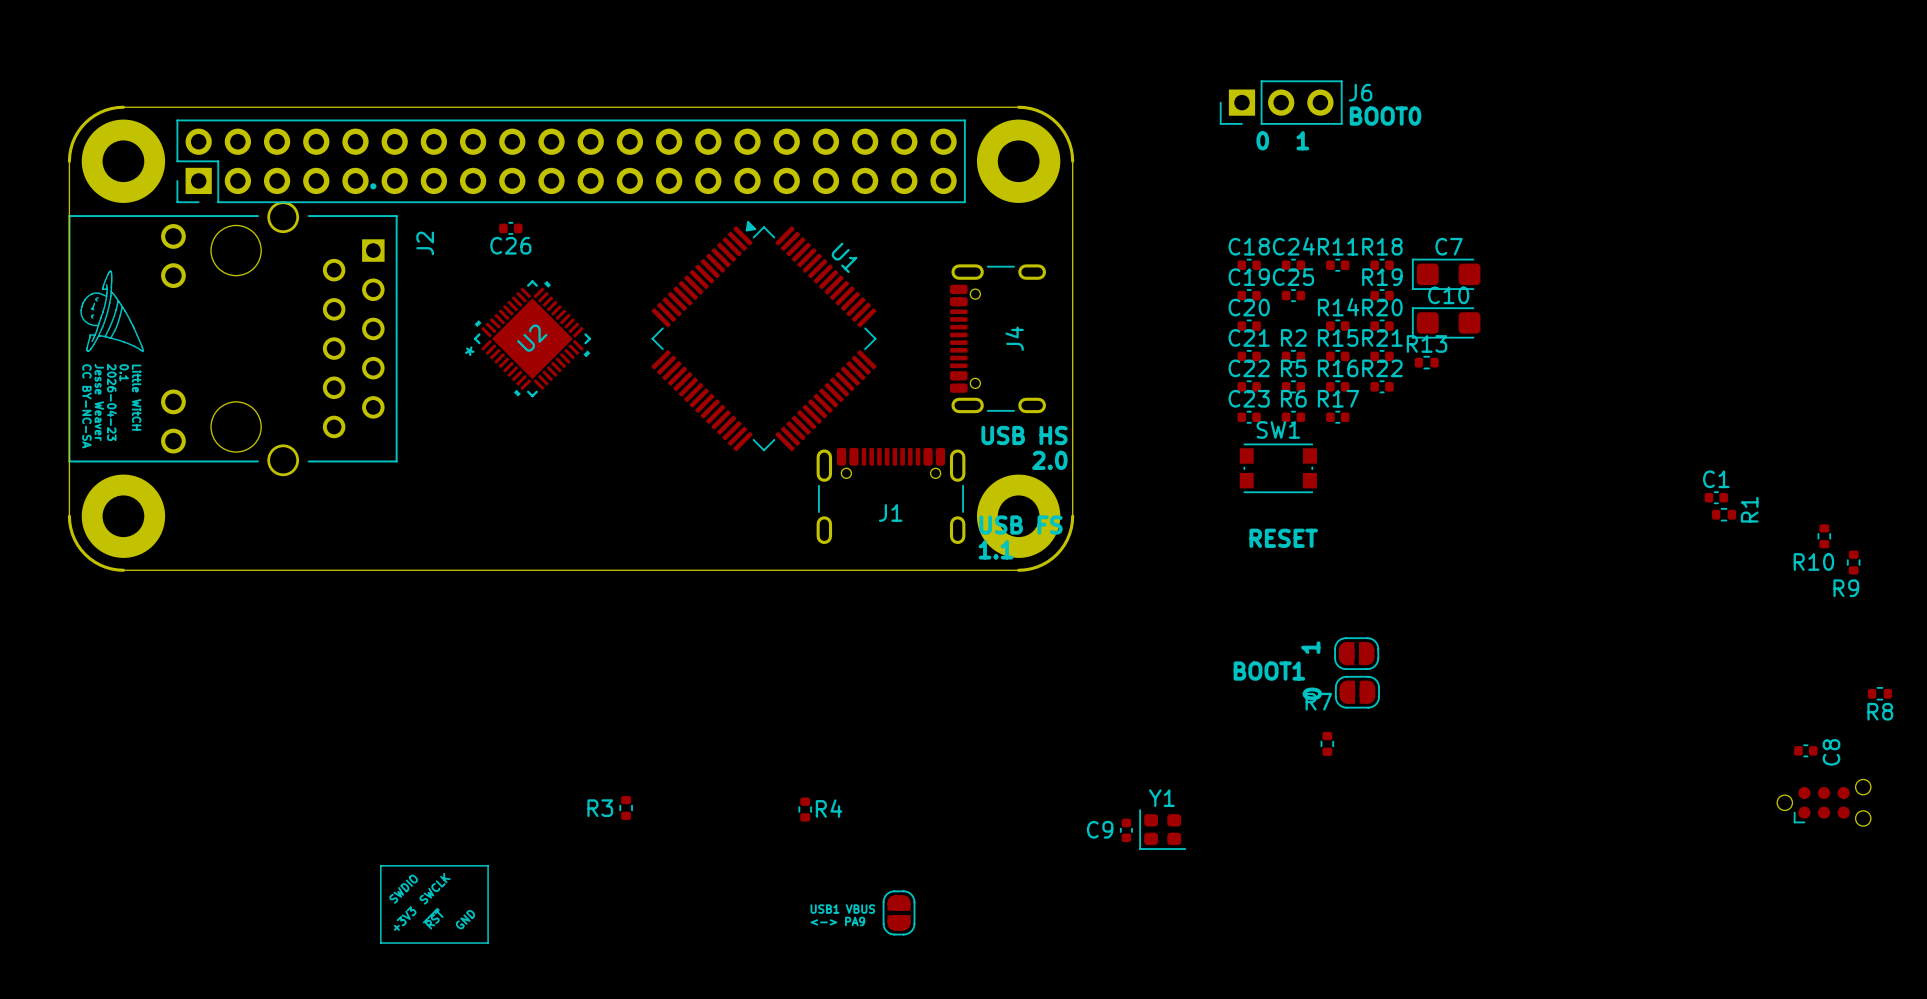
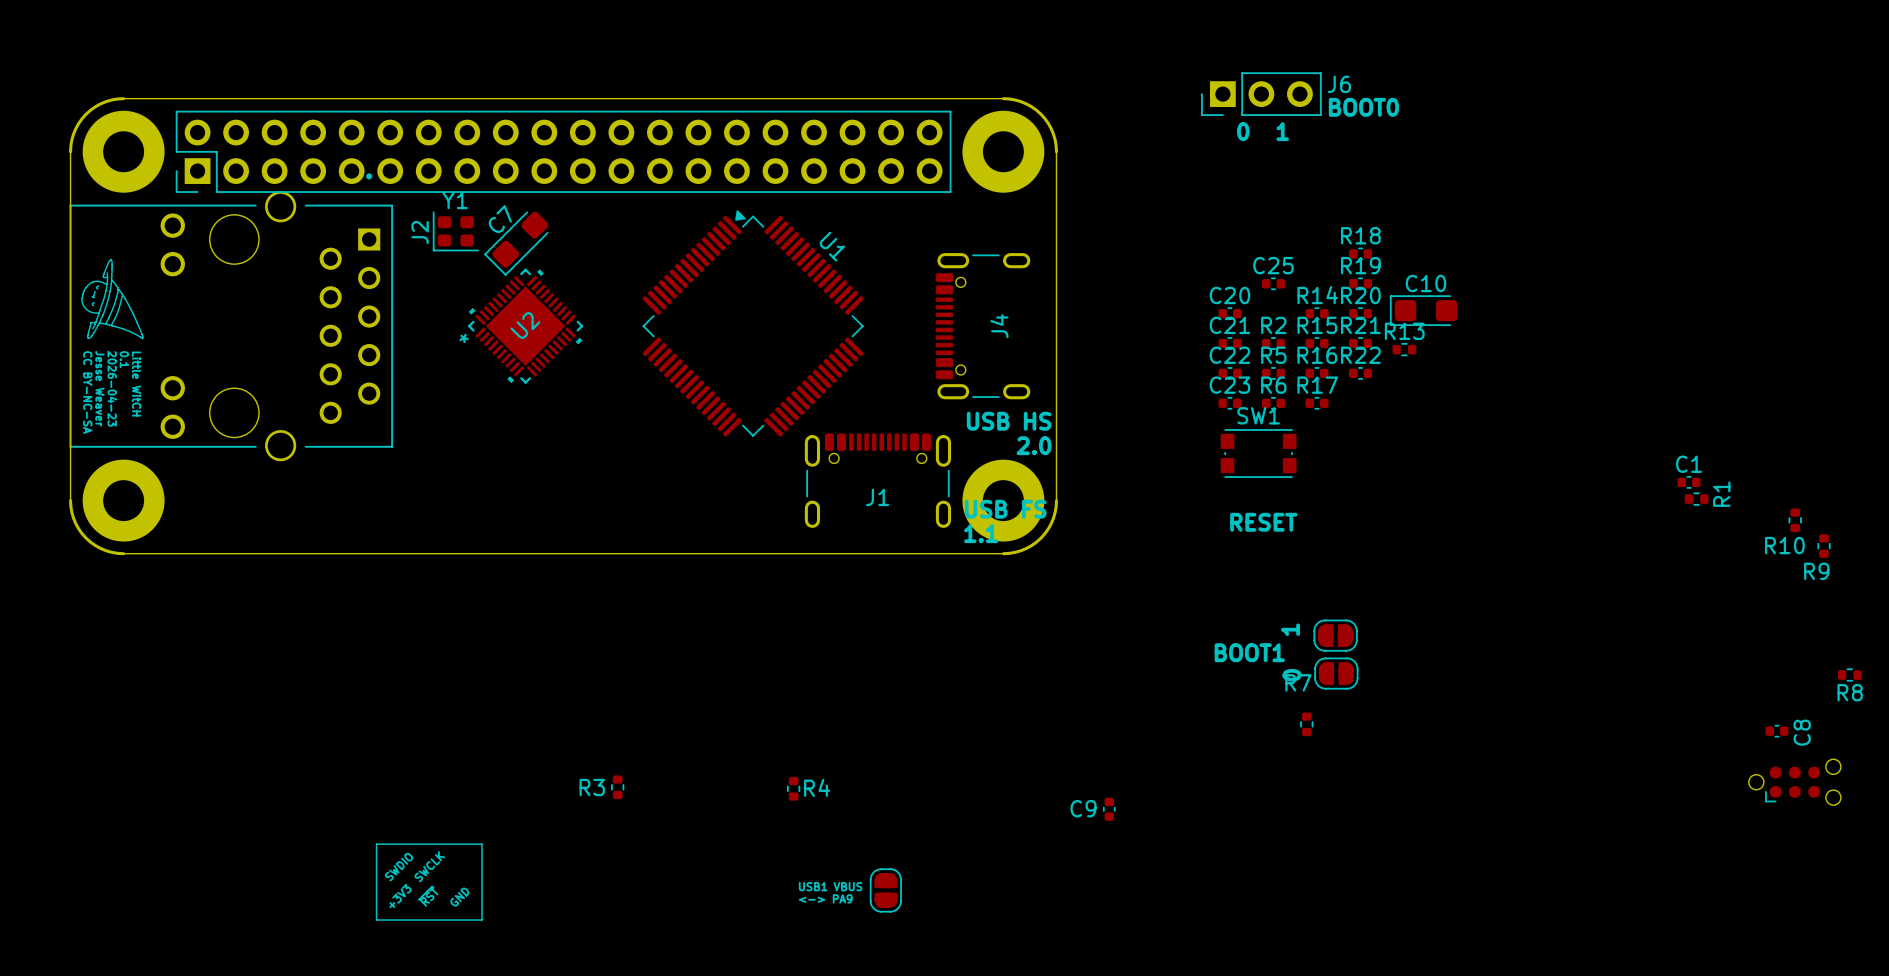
C26: (510, 228) -> none
C18: (1249, 265) -> none
C24: (1293, 265) -> none
R11: (1337, 265) -> none
C7 rotation: 0° (1446, 274) -> 45° counterclockwise (516, 243)
C7 position: (1446, 274) -> (516, 243)
C19: (1249, 295) -> none
Y1 position: (1162, 829) -> (455, 231)

